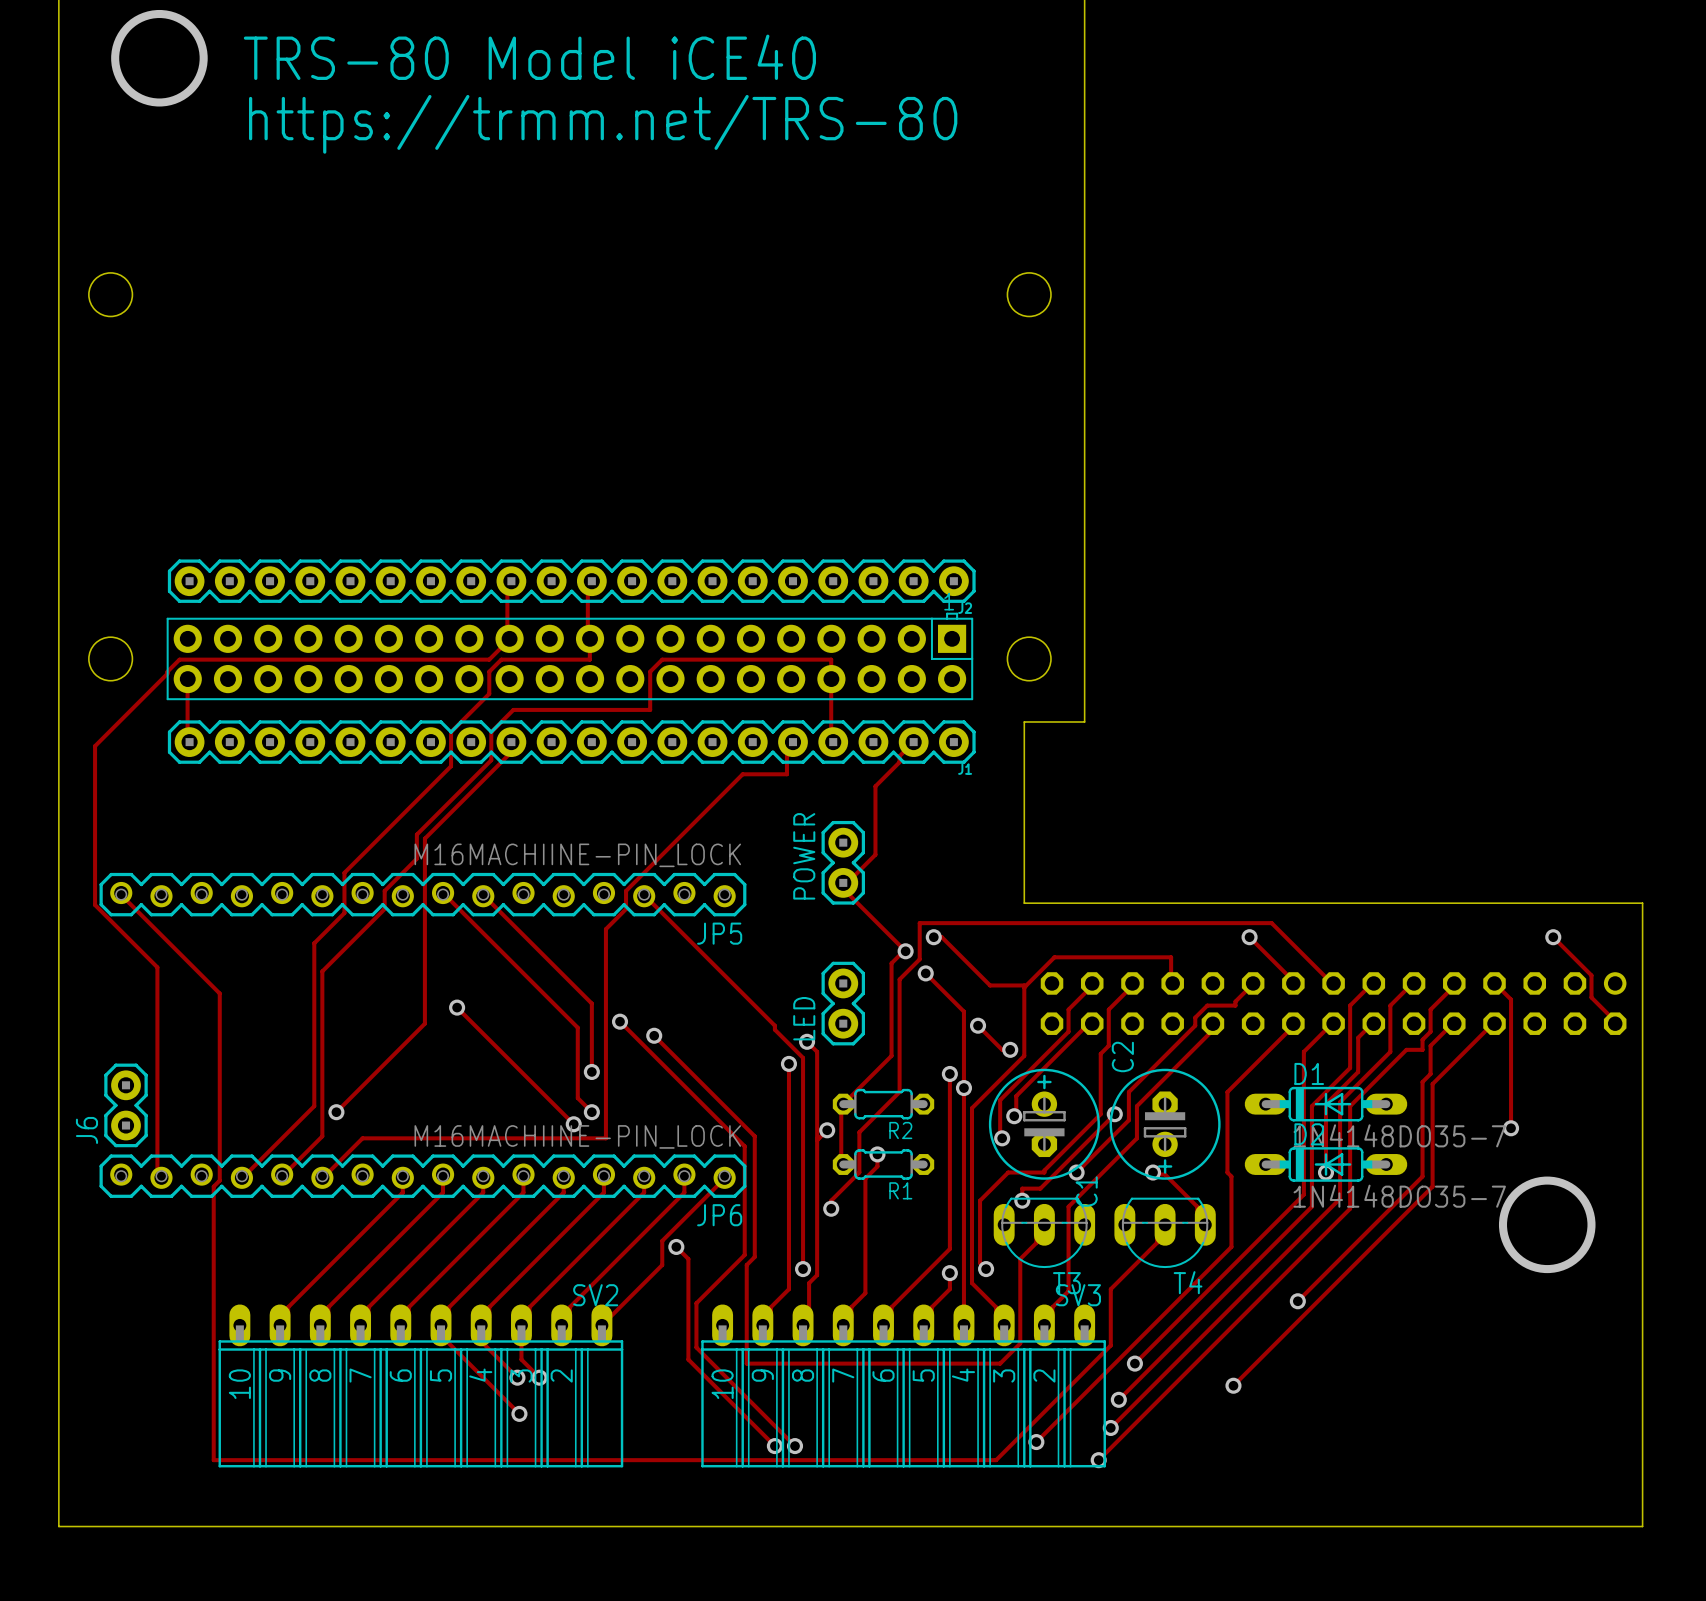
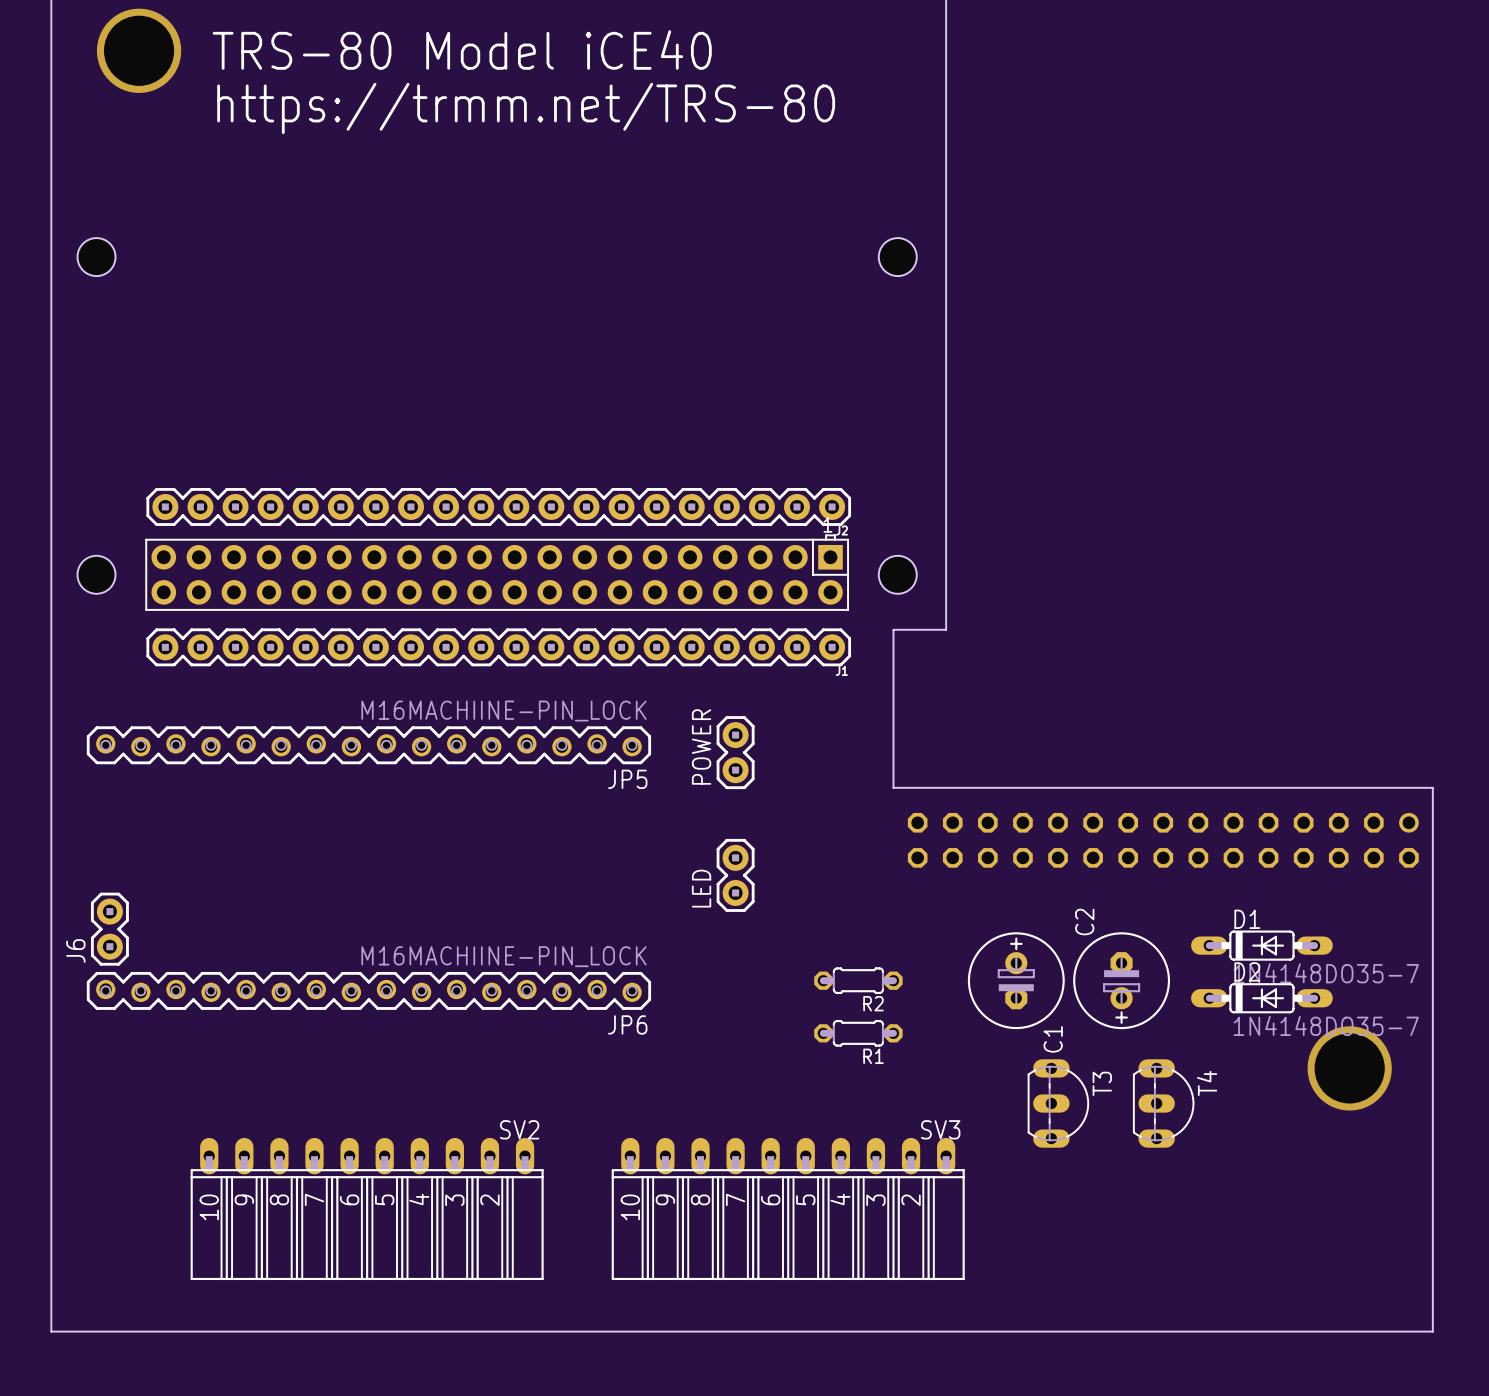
track: (511, 581) (507, 585) (507, 639) (509, 639) (489, 659) (179, 659) (95, 746) (95, 905) (157, 967) (157, 1172) (161, 1177) -> none
track: (591, 581) (587, 585) (589, 659) (501, 659) (489, 671) (489, 693) (451, 732) (451, 766) (344, 872) (344, 913) (314, 943) (314, 1106) (241, 1177) -> none
track: (187, 679) (187, 740) (189, 742) -> none
track: (511, 742) (511, 752) (424, 838) (424, 1023) (336, 1112) -> none
track: (792, 742) (792, 750) (786, 756) (786, 774) (742, 774) (626, 890) (626, 909) (605, 929) (605, 1138) (362, 1138) (322, 1177) -> none
track: (833, 742) (831, 740) (831, 659) (662, 659) (650, 671) (650, 709) (513, 709) (491, 732) (491, 760) (416, 834) (416, 858) (384, 890) (384, 909) (322, 971) (322, 1136) (282, 1174) -> none
track: (913, 742) (899, 756) (899, 762) (875, 786) (875, 854) (843, 886) -> none
track: (843, 882) (843, 888) (905, 951) (891, 963) (891, 1055) (841, 1106) (841, 1162) (843, 1164) -> none
track: (121, 893) (219, 993) (219, 1180) (213, 1186) (213, 1460) (996, 1460) (1110, 1345) (1110, 1289) (1157, 1242) (1157, 1232) (1165, 1224) -> none
track: (443, 893) (577, 1027) (577, 1098) (591, 1112) -> none
JP5 position: (422, 894) -> (368, 745)
track: (483, 896) (591, 1003) (591, 1071) -> none
track: (644, 896) (774, 1025) (774, 1029) (803, 1057) (803, 1269) -> none
track: (933, 937) (941, 937) (990, 985) (1025, 986) -> none
via: (933, 937) -> none
track: (1249, 937) (1291, 979) (1293, 983) -> none
via: (1249, 937) -> none
track: (1553, 937) (1591, 975) (1591, 997) (1613, 1019) (1615, 1023) -> none
via: (1553, 937) -> none
via: (905, 951) -> none
track: (925, 973) (963, 1011) (963, 1325) -> none
via: (925, 973) -> none
track: (1092, 983) (1090, 987) (1068, 1009) (1068, 1031) (1000, 1100) (1000, 1136) (1002, 1138) -> none
track: (1132, 983) (1130, 987) (1108, 1009) (1108, 1045) (1100, 1053) (1100, 1114) (1044, 1172) (1008, 1172) (980, 1200) (980, 1263) (986, 1269) -> none
track: (1172, 983) (1171, 983) (1171, 957) (1054, 957) (1024, 987) (1024, 1055) (972, 1108) (972, 1283) (996, 1307) (996, 1317) (1004, 1325) -> none
track: (1253, 983) (1235, 1001) (1235, 1005) (1207, 1005) (1195, 1017) (1195, 1025) (1128, 1092) (1128, 1120) (1076, 1172) -> none
track: (1333, 983) (1271, 923) (919, 923) (919, 959) (899, 979) (899, 1092) (859, 1132) (859, 1172) (831, 1200) (831, 1208) -> none
track: (1373, 983) (1350, 1005) (1350, 1067) (1311, 1106) (1311, 1206) (1118, 1399) -> none
track: (1414, 983) (1390, 1005) (1390, 1051) (1340, 1102) (1340, 1198) (1110, 1427) -> none
track: (1454, 983) (1452, 987) (1430, 1009) (1430, 1031) (1422, 1039) (1422, 1049) (1406, 1049) (1350, 1106) (1350, 1208) (1098, 1460) -> none
track: (1494, 983) (1511, 999) (1511, 1128) -> none
part position: (1333, 1003) -> (1163, 840)
track: (457, 1007) (573, 1124) -> none
via: (457, 1007) -> none
track: (620, 1021) (744, 1146) (744, 1254) (696, 1303) (696, 1347) (795, 1446) -> none
via: (620, 1021) -> none
track: (1092, 1023) (1088, 1023) (1016, 1096) (1016, 1114) (1014, 1116) -> none
track: (1212, 1023) (1211, 1023) (1211, 1031) (1136, 1106) (1136, 1138) (1068, 1206) (1068, 1291) (1052, 1307) (1052, 1317) (1044, 1325) -> none
track: (1293, 1023) (1291, 1027) (1227, 1092) (1227, 1172) (1231, 1176) (1231, 1246) (1036, 1442) -> none
track: (1333, 1023) (1303, 1051) (1303, 1194) (1134, 1363) -> none
track: (1373, 1023) (1358, 1037) (1358, 1071) (1326, 1104) (1326, 1172) -> none
track: (1454, 1023) (1430, 1045) (1430, 1073) (1422, 1082) (1422, 1176) (1297, 1301) -> none
track: (1494, 1023) (1432, 1084) (1432, 1186) (1233, 1385) -> none
track: (978, 1025) (1002, 1049) (1010, 1049) -> none
via: (978, 1025) -> none
track: (654, 1035) (754, 1136) (754, 1257) (746, 1265) (746, 1363) (1000, 1363) (1020, 1343) (1020, 1259) (1036, 1242) (1036, 1232) (1044, 1224) -> none
via: (654, 1035) -> none
track: (807, 1041) (817, 1051) (818, 1139) -> none
via: (807, 1041) -> none
via: (1010, 1049) -> none
track: (788, 1063) (788, 1289) (770, 1307) (770, 1317) (762, 1325) -> none
via: (788, 1063) -> none
via: (591, 1071) -> none
track: (949, 1073) (949, 1248) (891, 1307) (891, 1317) (883, 1325) -> none
via: (949, 1073) -> none
via: (963, 1088) -> none
R2 position: (883, 1104) -> (858, 980)
D1 position: (1326, 1104) -> (1261, 945)
J6 position: (126, 1105) -> (109, 929)
via: (336, 1112) -> none
via: (591, 1112) -> none
track: (1114, 1114) (1040, 1188) (1022, 1188) (1022, 1200) -> none
via: (1114, 1114) -> none
via: (1014, 1116) -> none
via: (573, 1124) -> none
C1 position: (1044, 1124) -> (1016, 980)
C2 position: (1165, 1124) -> (1121, 980)
via: (1511, 1128) -> none
track: (827, 1130) (817, 1140) (817, 1275) (809, 1283) (809, 1319) (803, 1325) -> none
via: (827, 1130) -> none
via: (1002, 1138) -> none
track: (877, 1154) (877, 1166) (865, 1178) (865, 1293) (851, 1307) (851, 1317) (843, 1325) -> none
via: (877, 1154) -> none
R1 position: (883, 1164) -> (858, 1033)
D2 position: (1326, 1164) -> (1261, 998)
via: (1076, 1172) -> none
track: (1153, 1172) (1153, 1174) (1165, 1174) (1197, 1206) (1197, 1216) (1205, 1224) -> none
via: (1153, 1172) -> none
via: (1326, 1172) -> none
track: (443, 1174) (443, 1192) (328, 1307) (328, 1317) (320, 1325) -> none
track: (523, 1174) (523, 1192) (408, 1307) (408, 1317) (400, 1325) -> none
track: (603, 1174) (603, 1192) (489, 1307) (489, 1317) (481, 1325) (483, 1325) (483, 1343) (517, 1377) -> none
track: (684, 1174) (684, 1192) (569, 1307) (569, 1317) (561, 1325) -> none
JP6 position: (422, 1176) -> (368, 990)
track: (402, 1177) (402, 1192) (288, 1307) (288, 1317) (280, 1325) -> none
track: (483, 1177) (483, 1192) (368, 1307) (368, 1317) (360, 1325) -> none
track: (563, 1177) (563, 1192) (449, 1307) (449, 1317) (441, 1325) (443, 1325) (443, 1337) (519, 1413) -> none
track: (644, 1177) (644, 1192) (529, 1307) (529, 1317) (521, 1325) (521, 1359) (539, 1377) -> none
track: (724, 1177) (662, 1240) (662, 1265) (601, 1325) -> none
via: (1022, 1200) -> none
via: (831, 1208) -> none
T3 rotation: 0° (1044, 1232) -> 90° counterclockwise (1058, 1103)
T3 position: (1044, 1232) -> (1058, 1103)
T4 rotation: 0° (1165, 1232) -> 90° counterclockwise (1163, 1103)
T4 position: (1165, 1232) -> (1163, 1103)
track: (676, 1246) (688, 1259) (688, 1359) (774, 1446) -> none
via: (676, 1246) -> none
via: (803, 1269) -> none
via: (986, 1269) -> none
track: (949, 1273) (949, 1289) (931, 1307) (931, 1317) (923, 1325) -> none
via: (949, 1273) -> none
via: (1297, 1301) -> none
via: (1134, 1363) -> none
via: (517, 1377) -> none
via: (539, 1377) -> none
via: (1233, 1385) -> none
via: (1118, 1399) -> none
via: (519, 1413) -> none
via: (1110, 1427) -> none
via: (1036, 1442) -> none
via: (774, 1446) -> none
via: (795, 1446) -> none
via: (1098, 1460) -> none

